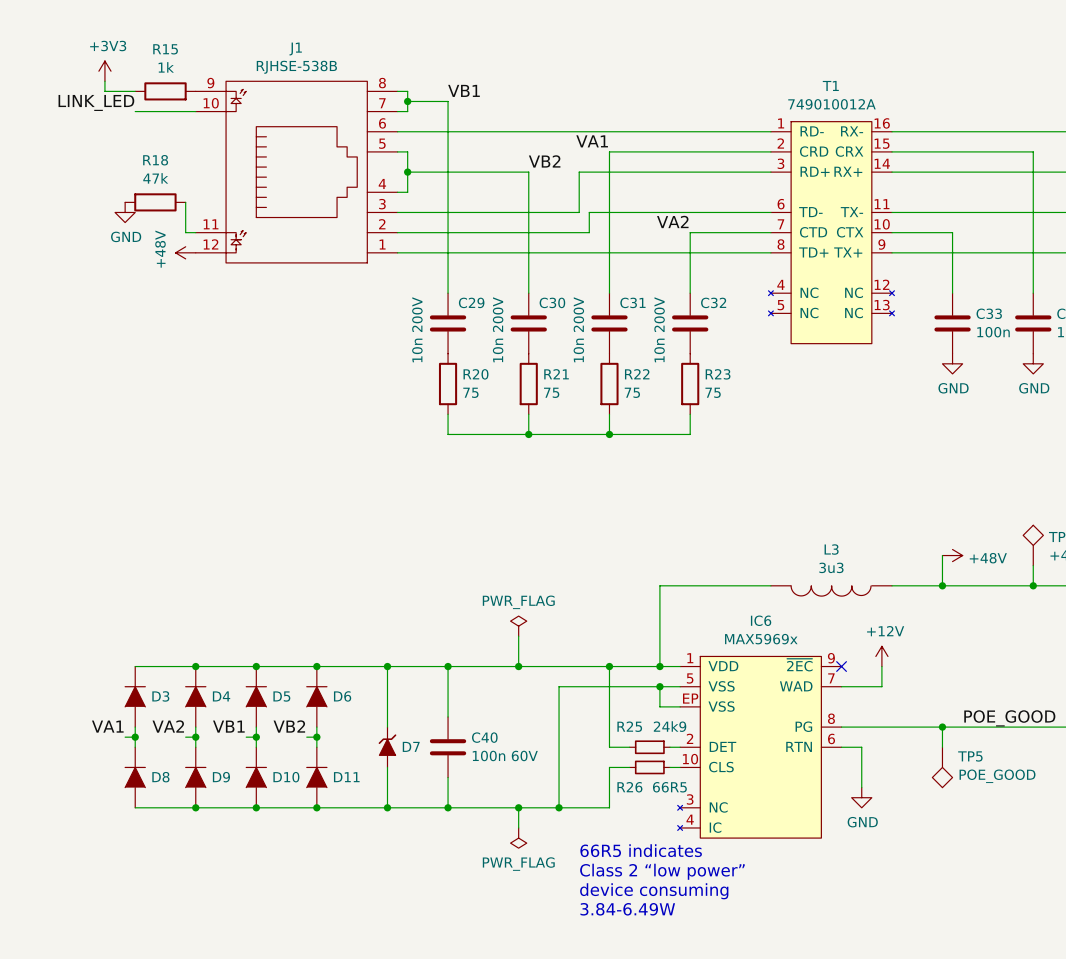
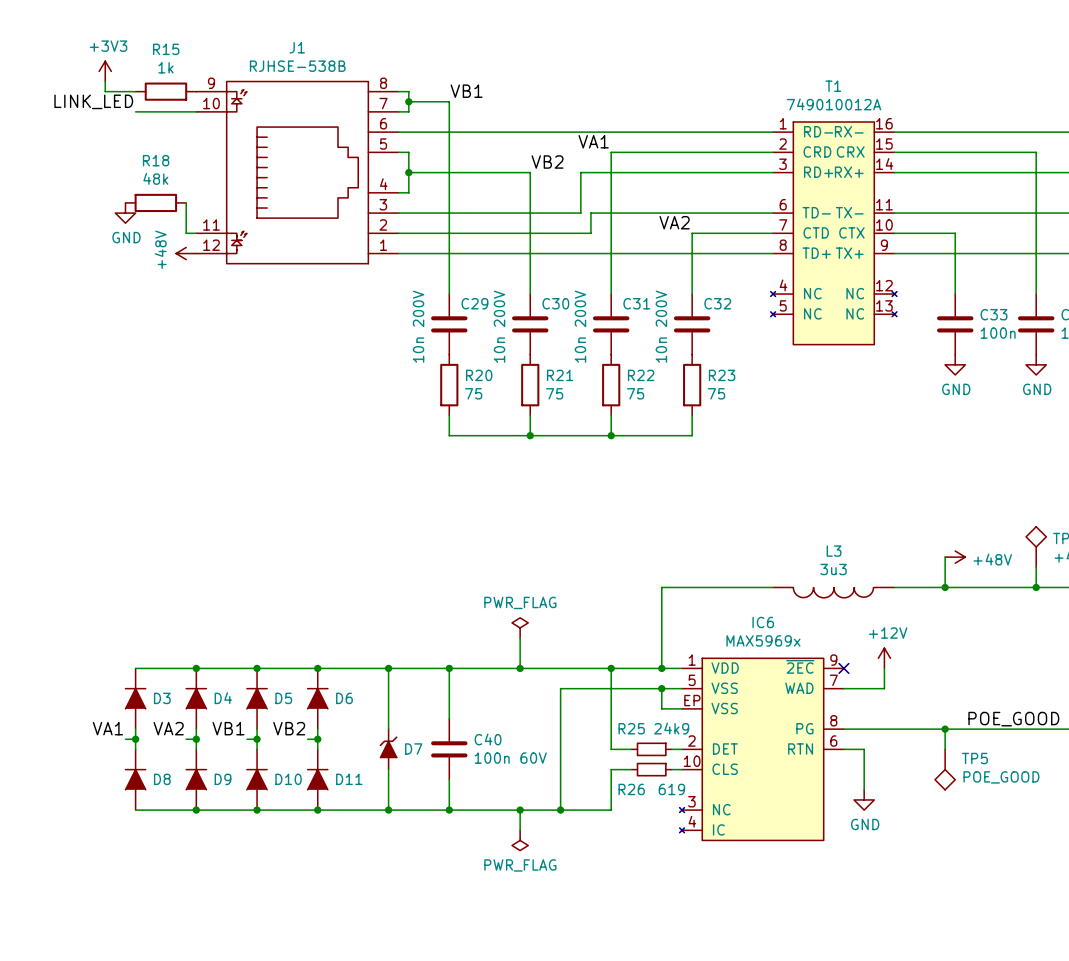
R18 value: 47k (155, 178) -> 48k (155, 178)
R26 value: 66R5 (669, 787) -> 619 (671, 789)
text: 66R5 indicates (641, 850) -> none
text: Class 2 “low power” (662, 871) -> none
text: device consuming (654, 891) -> none
text: 3.84-6.49W (627, 909) -> none

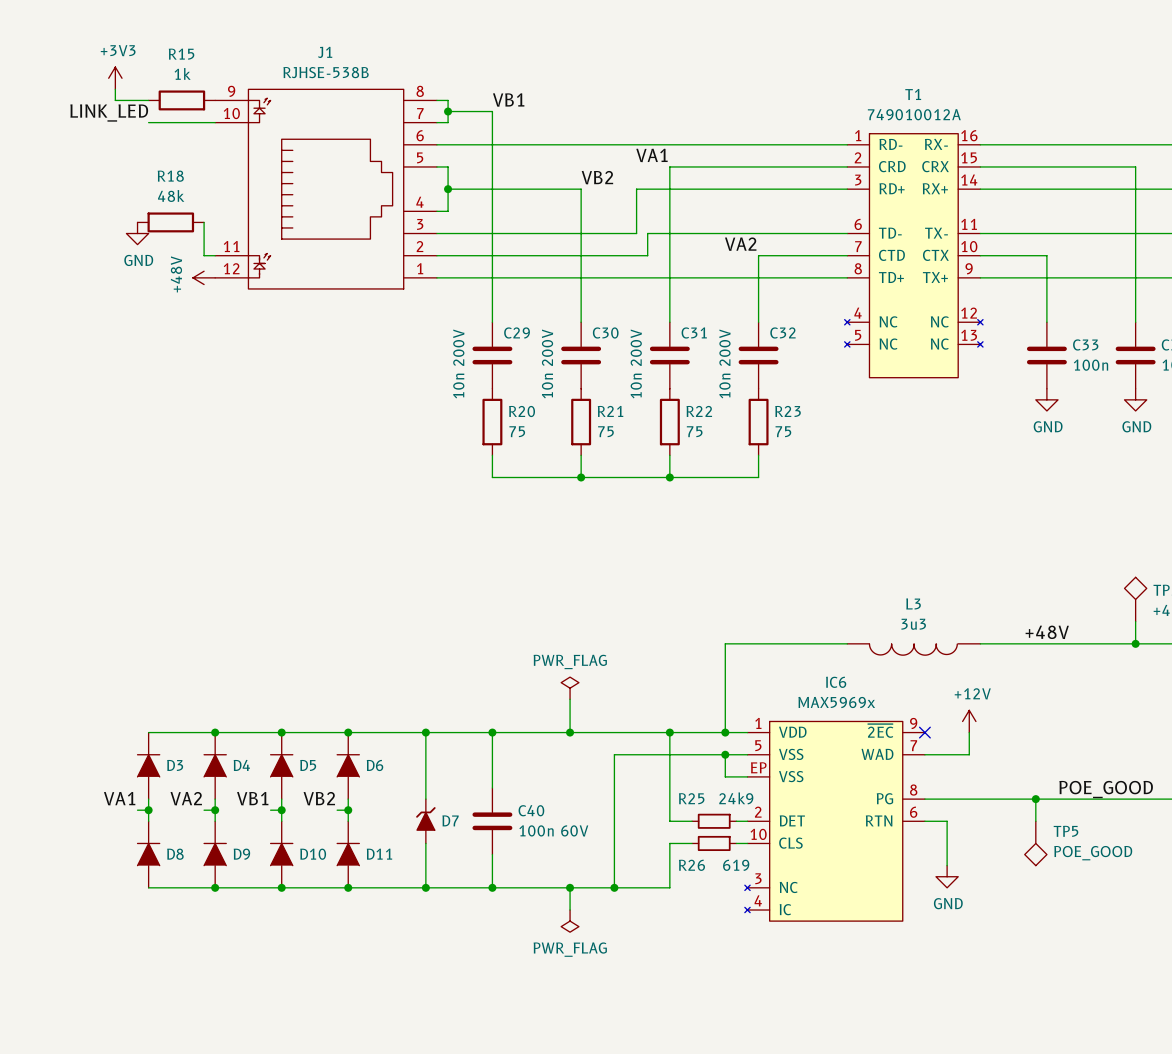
wire: (945, 557) (945, 587) -> none
power symbol: +48V (955, 557) -> none
label: none -> +48V (1047, 632)
junction: (945, 587) -> none

